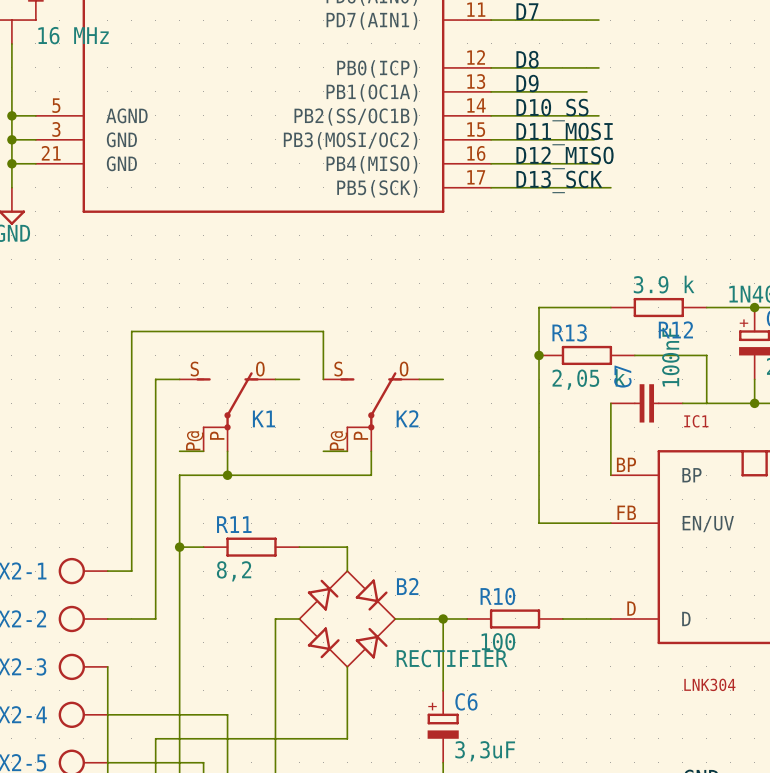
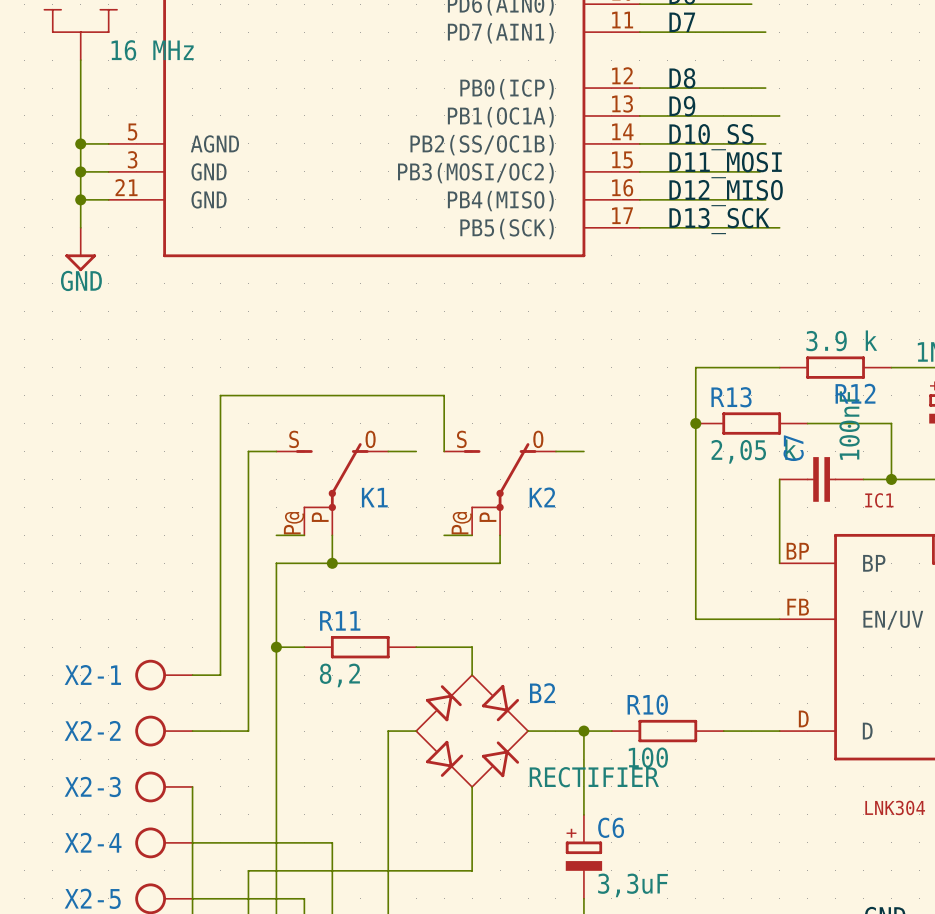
wire: none -> (751, 115) (779, 115)
junction: none -> (891, 479)

